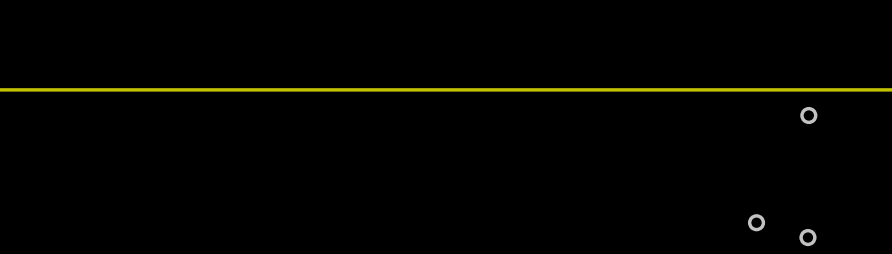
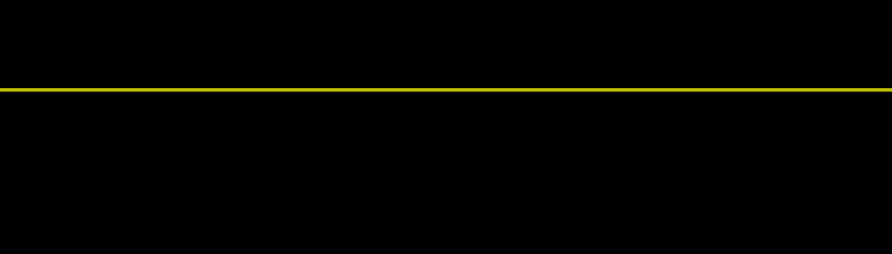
via: (808, 115) -> none
via: (756, 222) -> none
via: (807, 237) -> none

